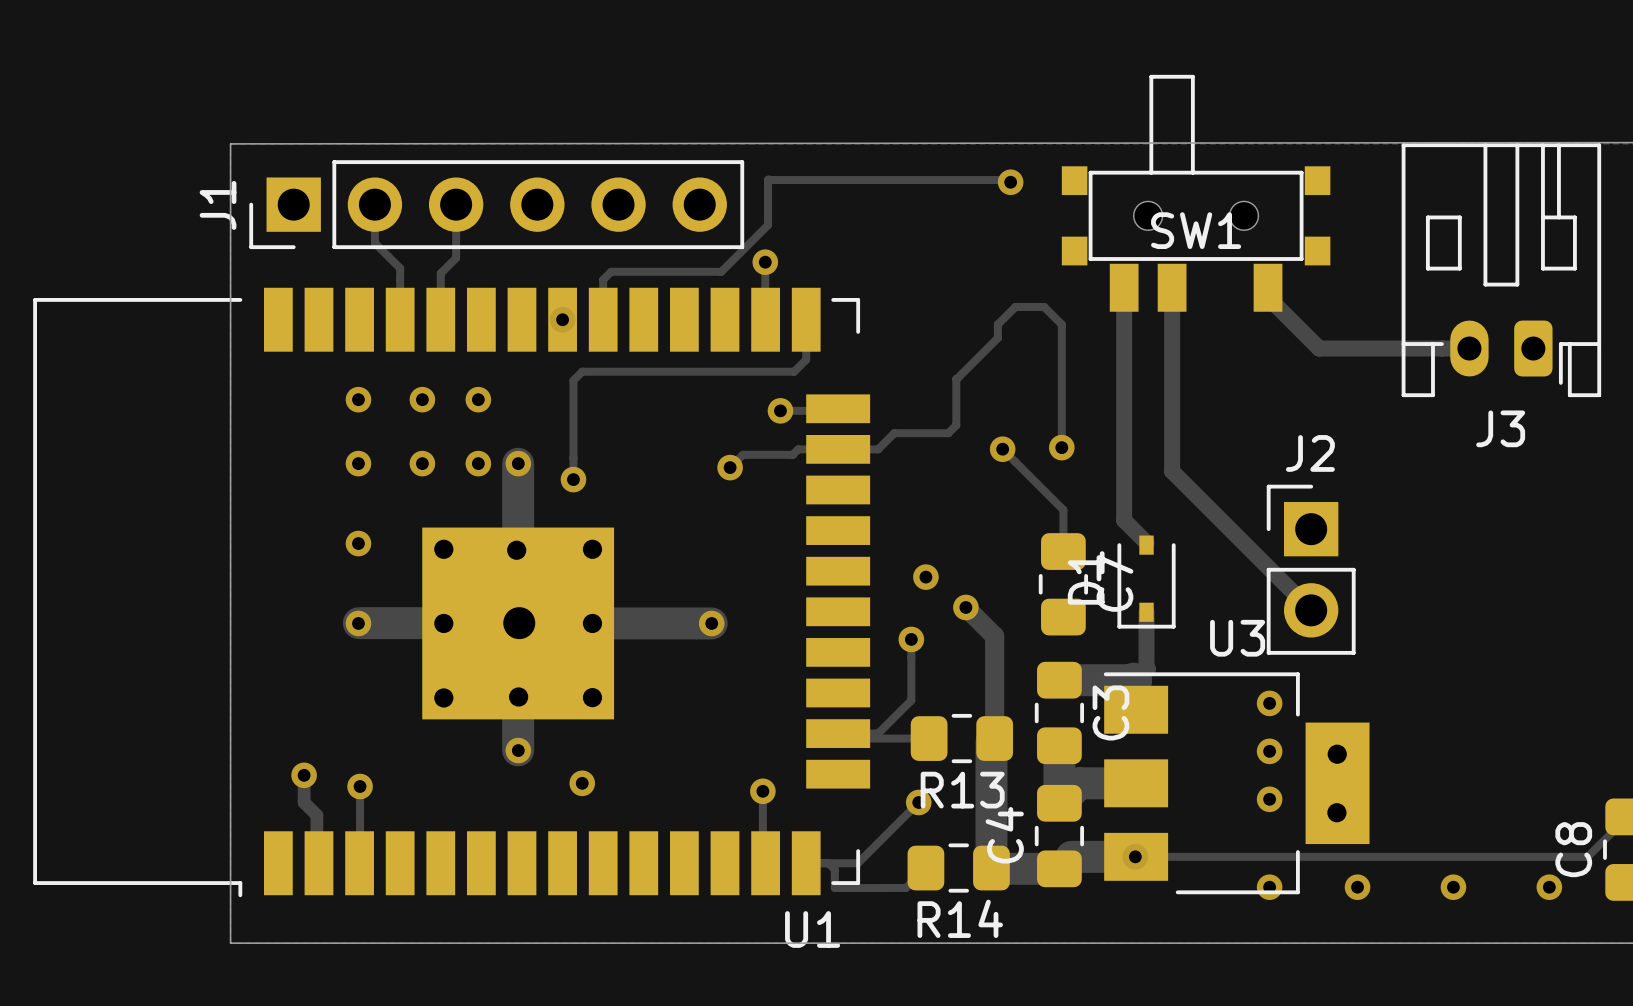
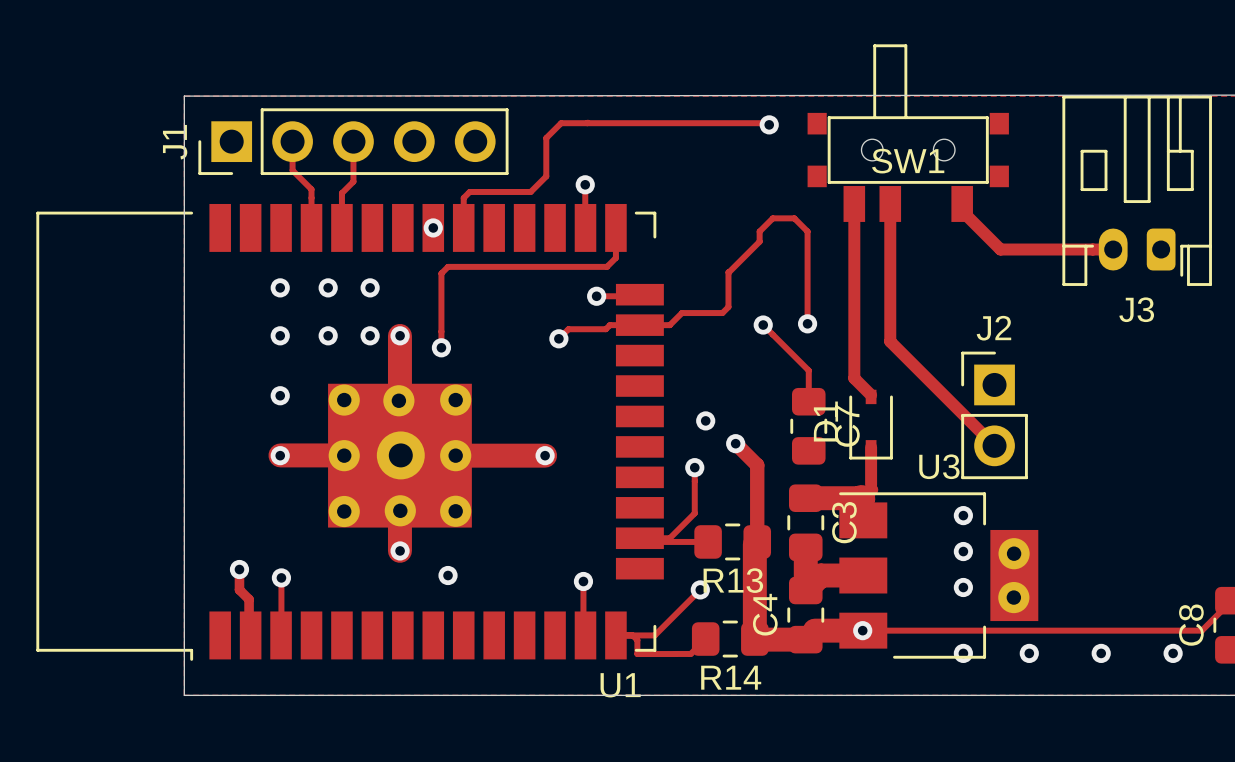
J1 footprint: [249, 160, 745, 250] -> [198, 108, 509, 175]
track: (768, 180) (768, 225) (721, 271) (692, 271) -> (587, 123) (561, 123) (546, 138) (546, 176) (530, 191)

